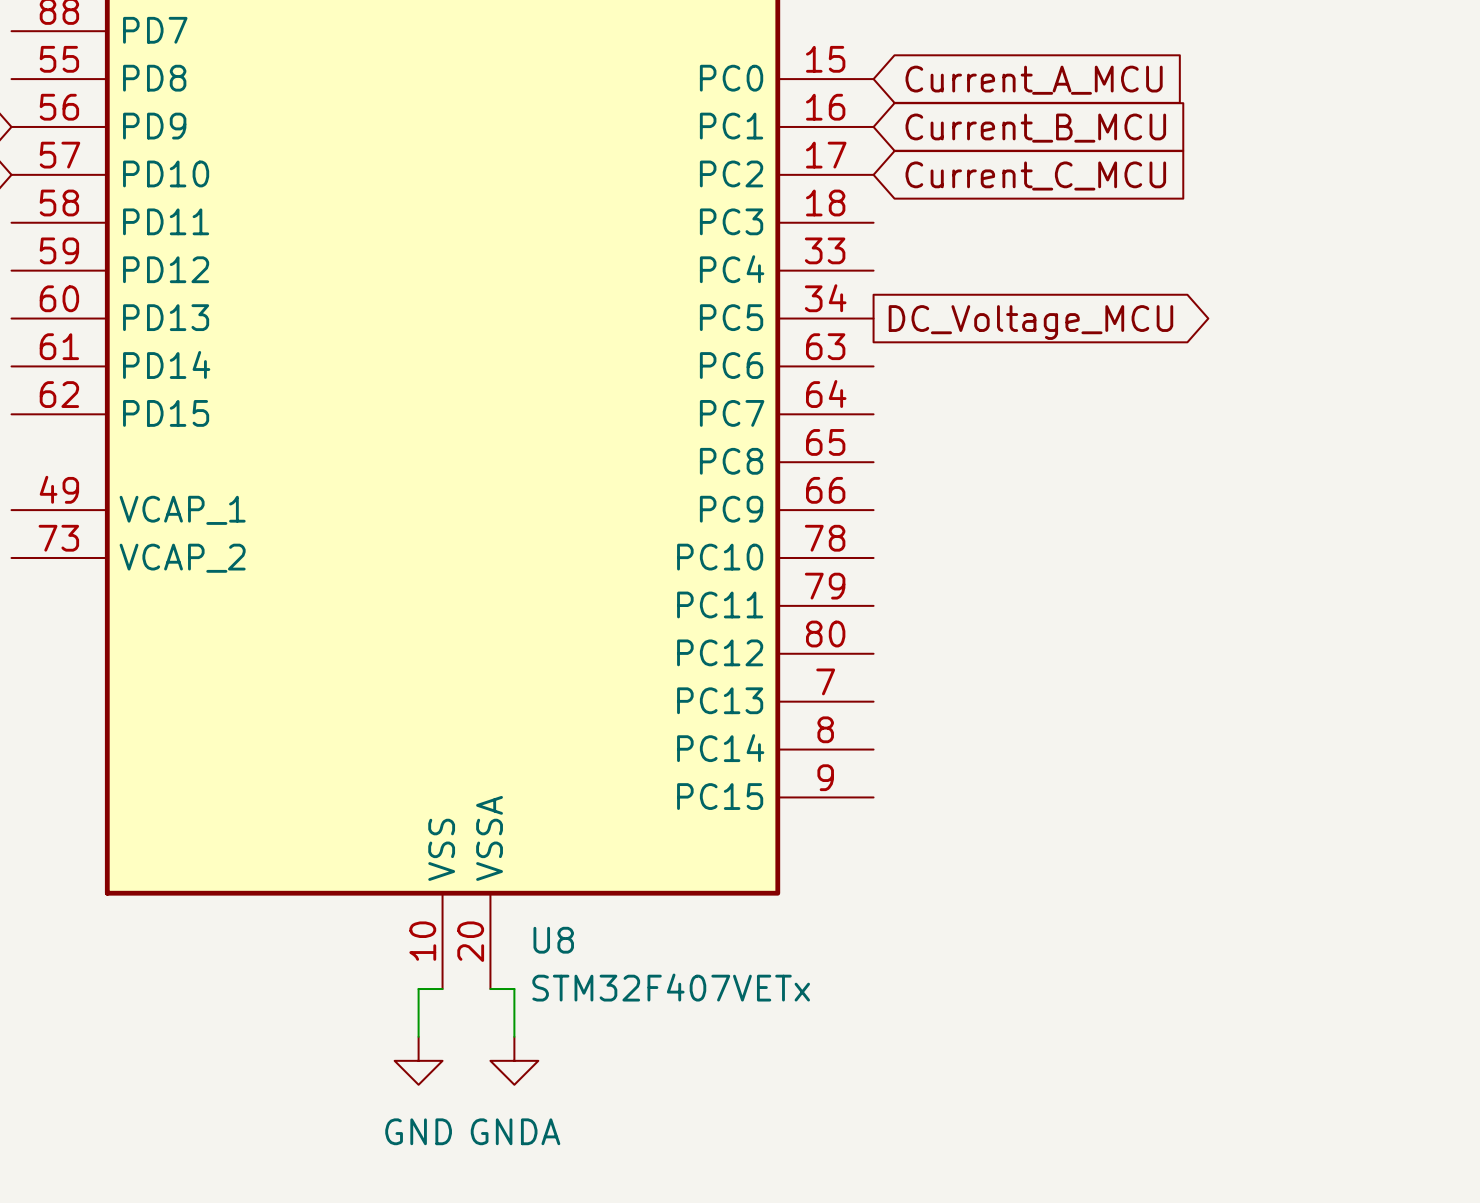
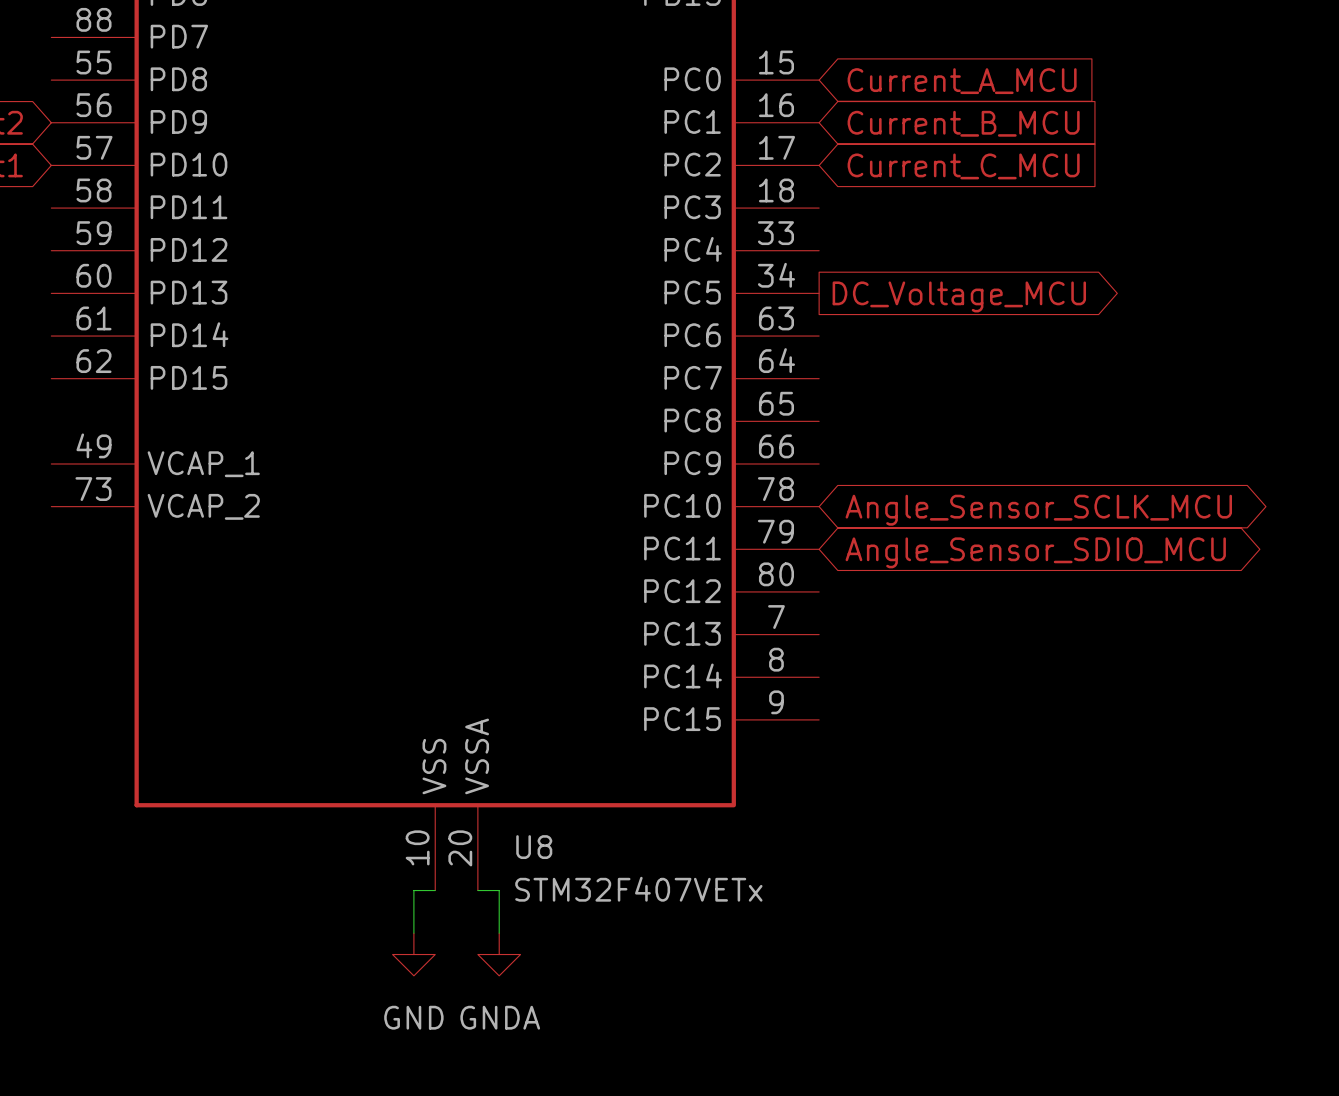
global label: none -> Angle_Sensor_SCLK_MCU (1038, 510)
global label: none -> Angle_Sensor_SDIO_MCU (1035, 552)

